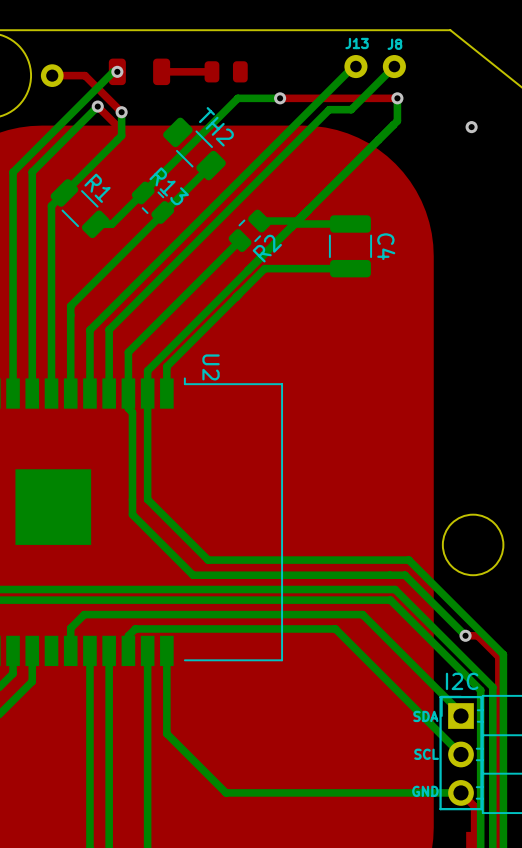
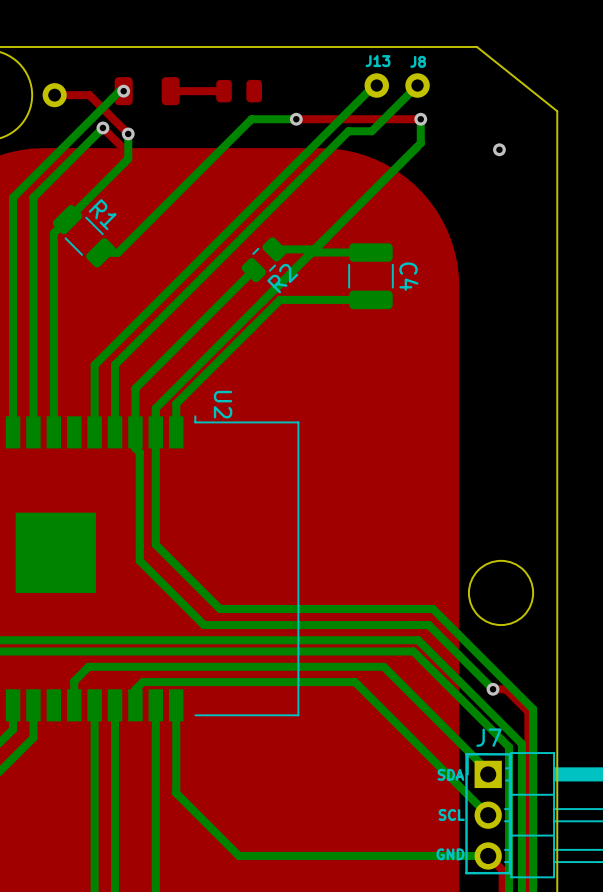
TH2: (194, 148) -> none
bottom track: (211, 165) (70, 305) (70, 393) -> none
R13: (152, 202) -> none
I2C name: I2C (462, 681) -> J7 (489, 737)

